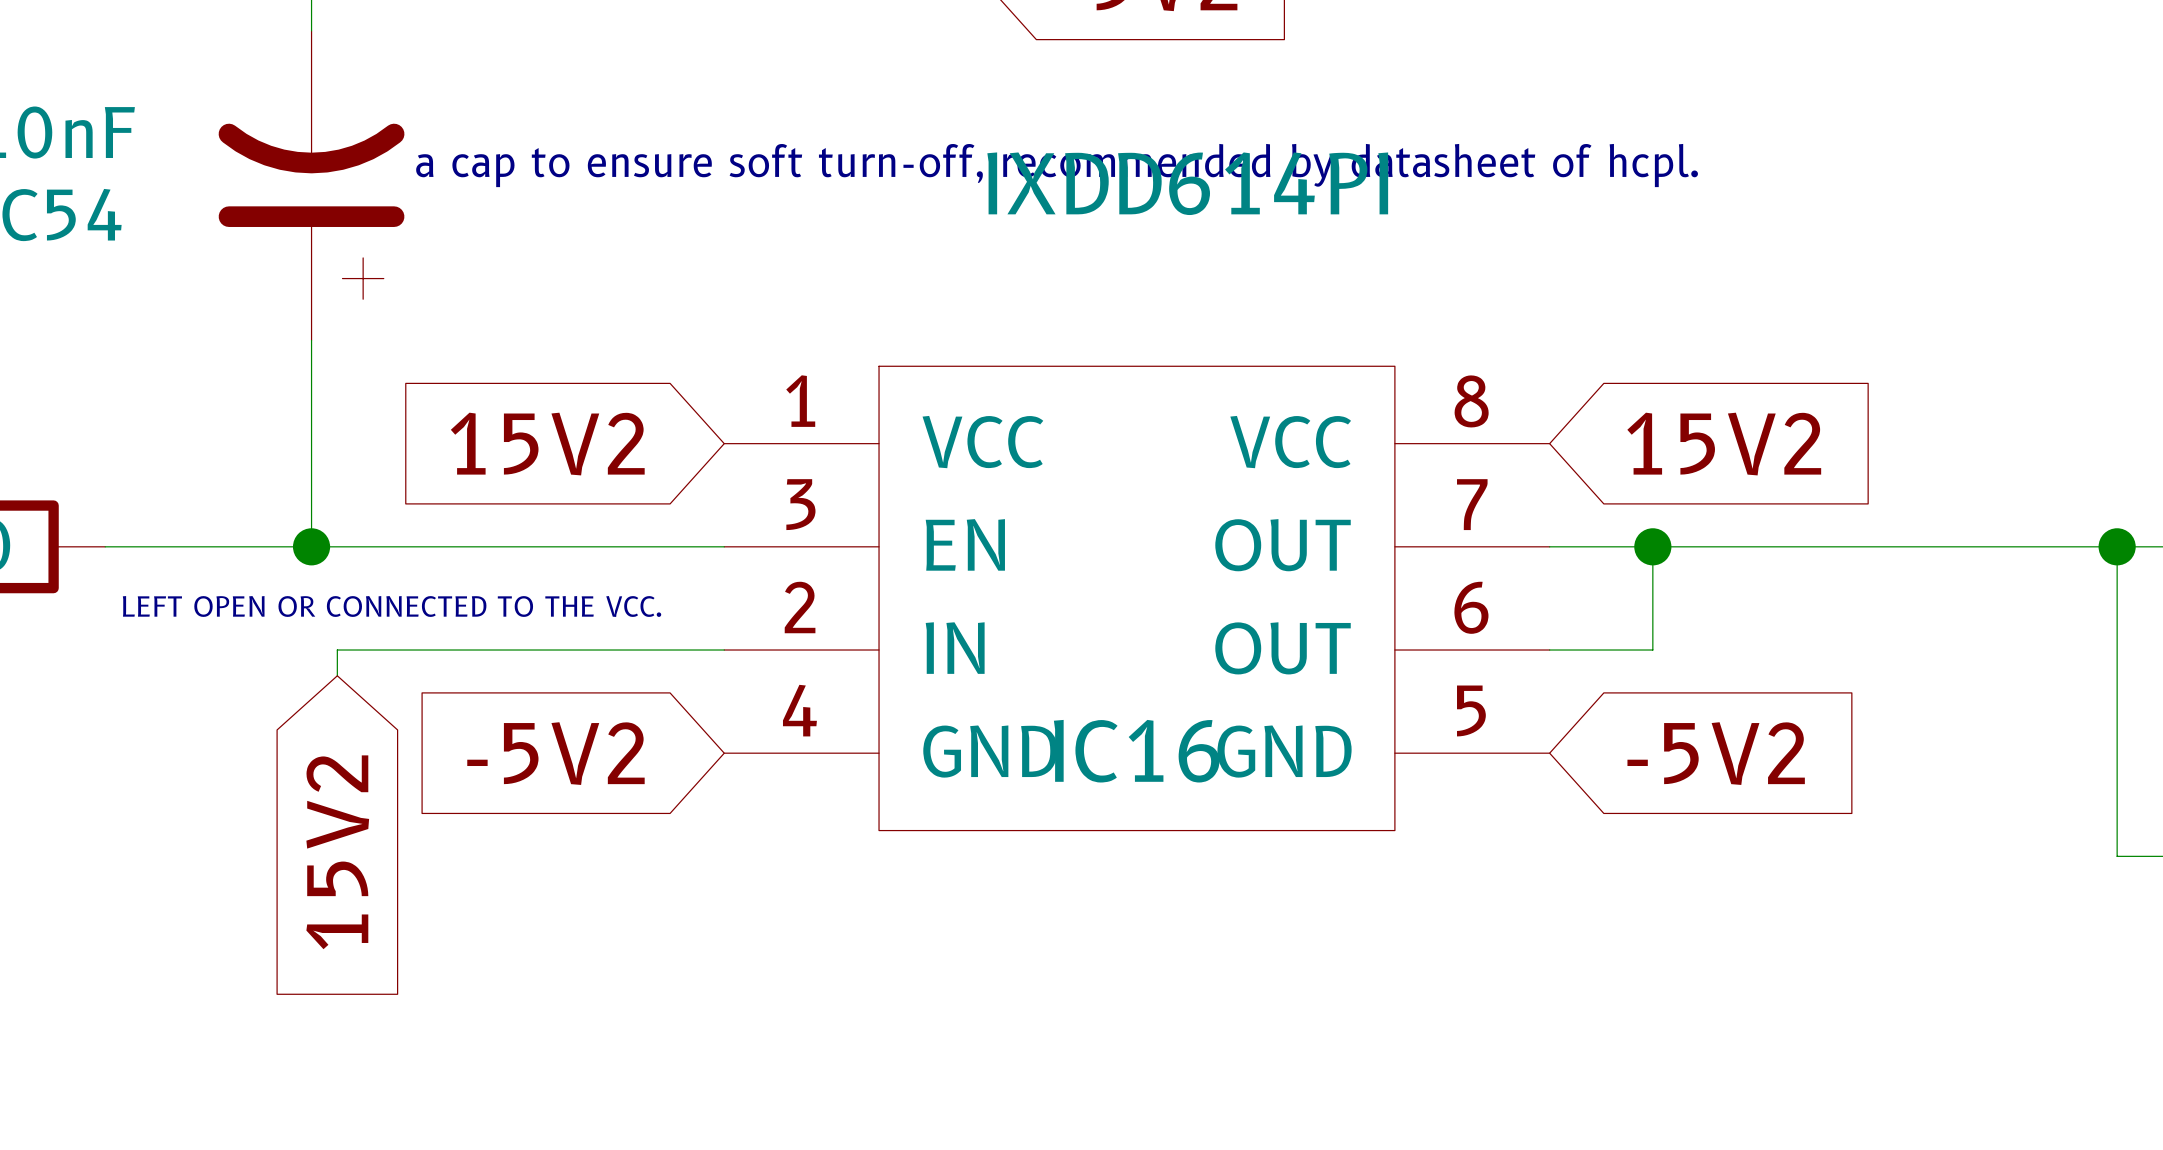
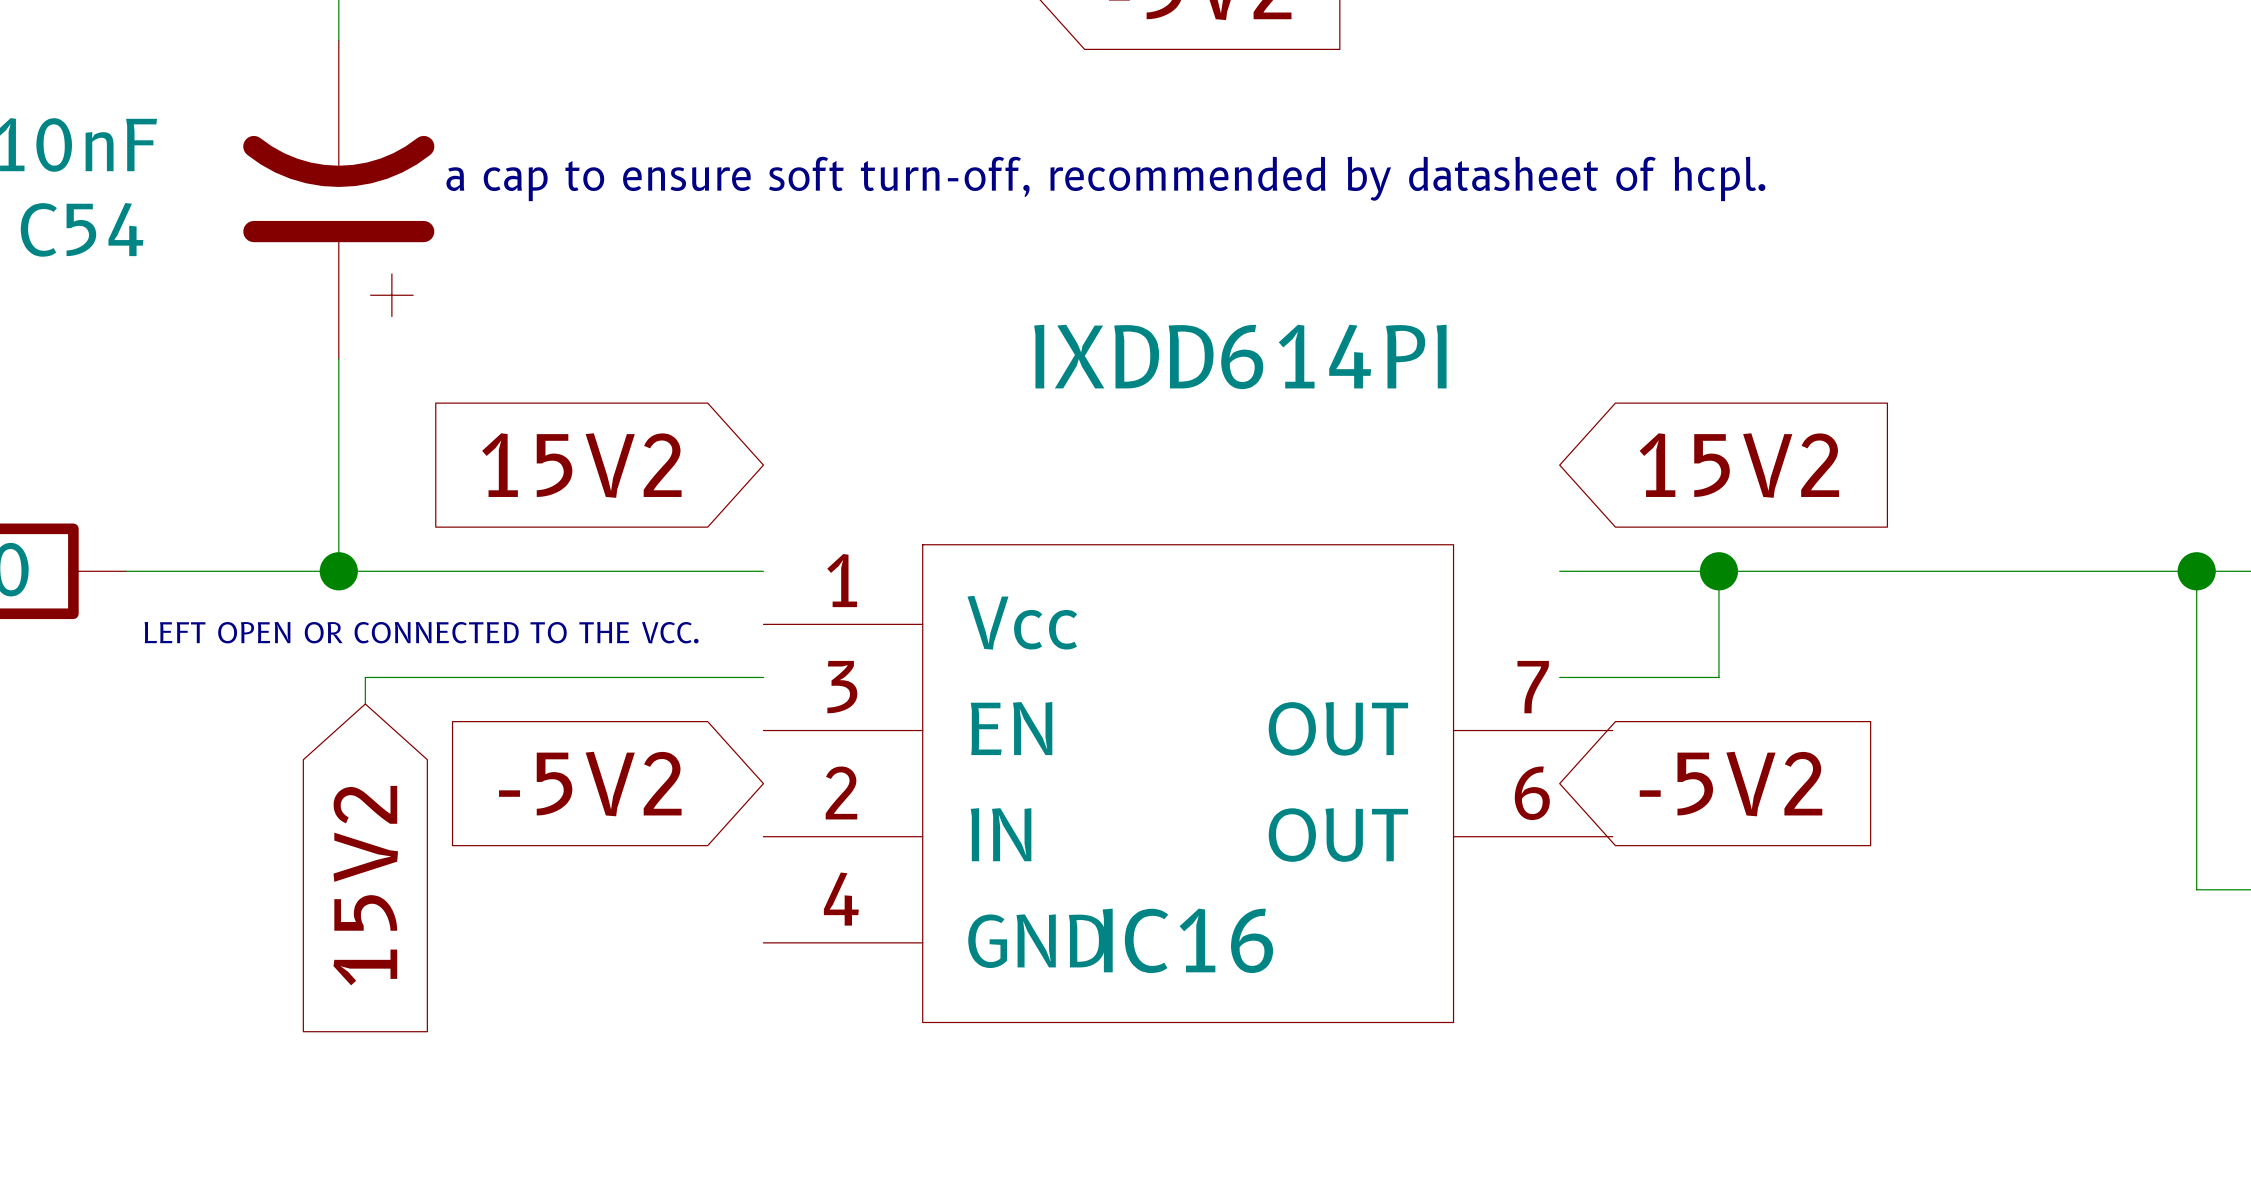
IC16 symbol: [724, 366, 1550, 831] -> [763, 544, 1613, 1023]
global label position: 15V2 (1724, 444) -> 15V2 (1739, 465)
global label position: -5V2 (1716, 753) -> -5V2 (1731, 784)

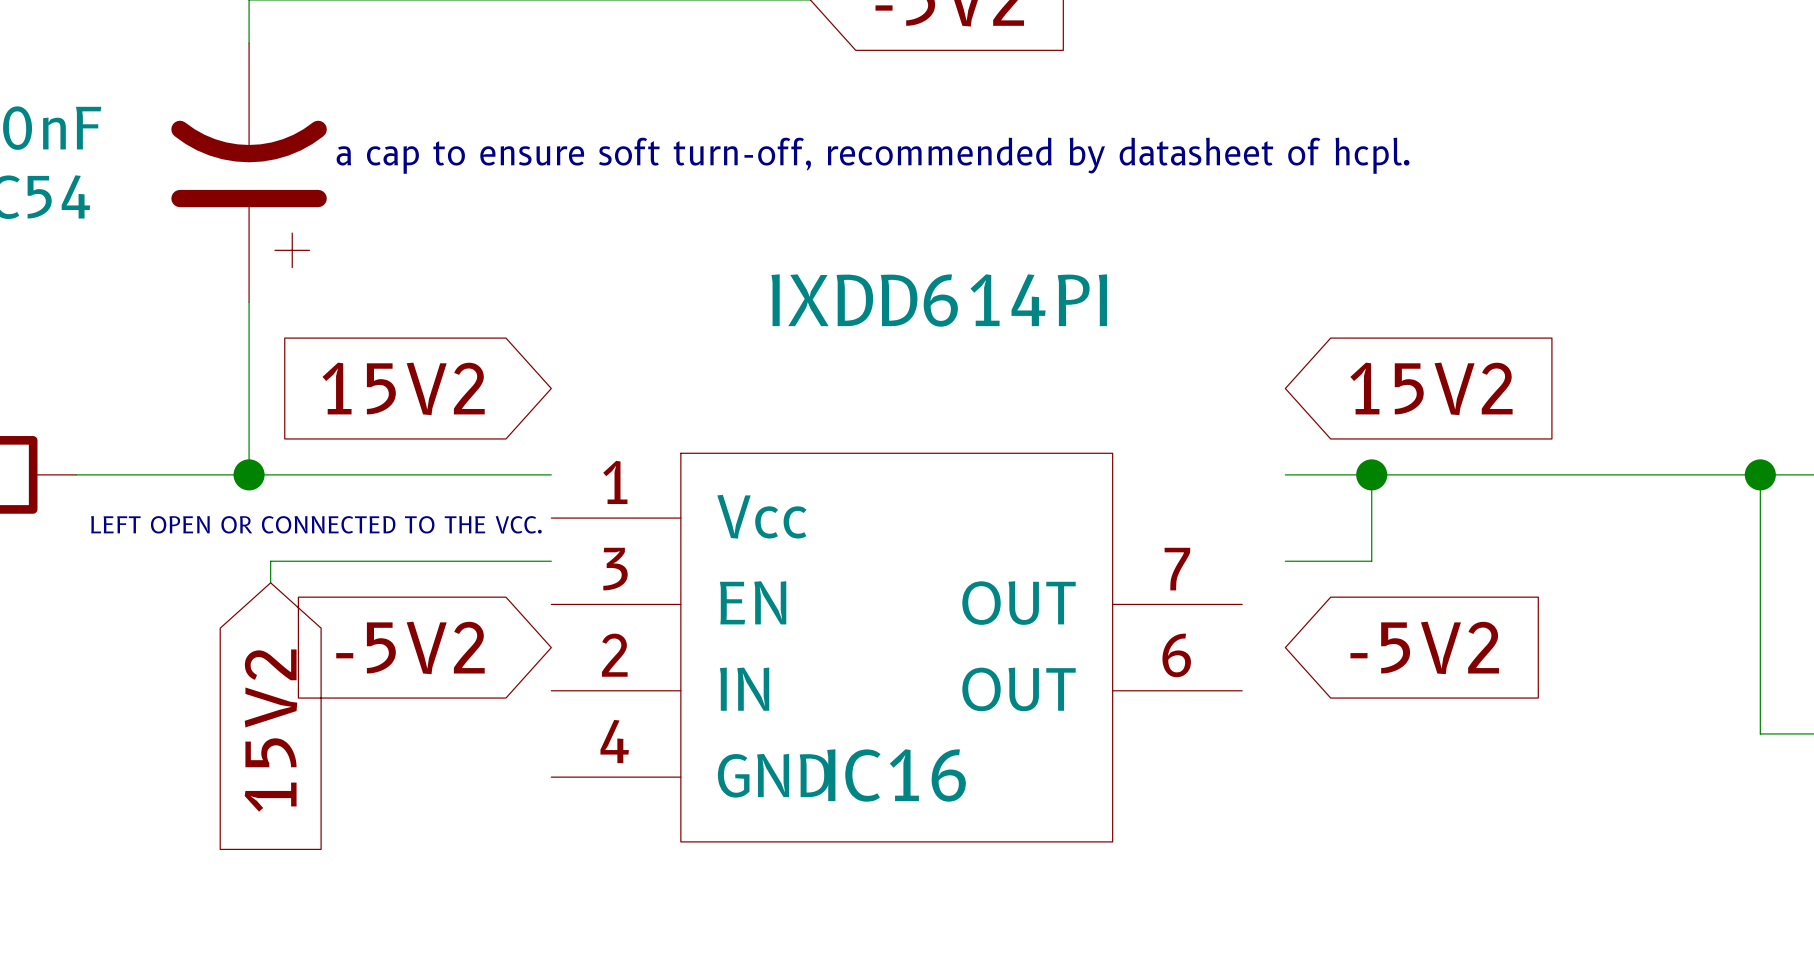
global label position: 15V2 (581, 465) -> 15V2 (403, 388)
global label position: 15V2 (1739, 465) -> 15V2 (1431, 388)
wire: (710, 571) (763, 571) -> none
wire: (1559, 571) (1612, 571) -> none
wire: (710, 677) (763, 677) -> none
wire: (1559, 677) (1612, 677) -> none
IC16 position: (1188, 783) -> (896, 647)
global label position: -5V2 (590, 784) -> -5V2 (410, 647)
global label position: -5V2 (1731, 784) -> -5V2 (1424, 647)

